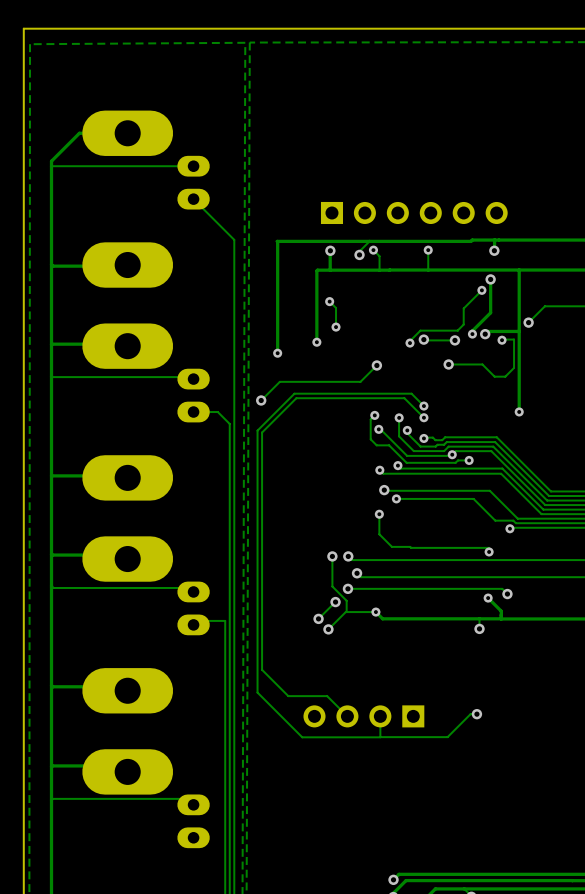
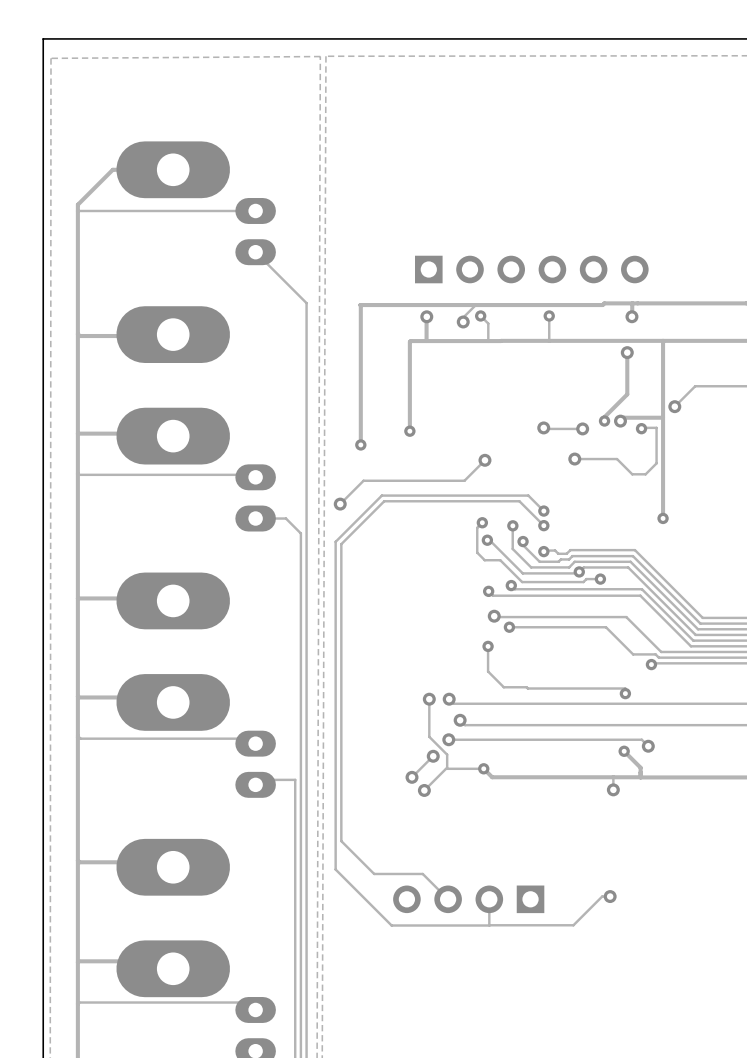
track: (481, 290) (463, 308) (463, 324) (457, 330) -> none
via: (481, 290) -> none
track: (329, 301) (336, 307) (336, 327) -> none
via: (329, 301) -> none
via: (336, 327) -> none
track: (457, 330) (420, 330) (409, 343) -> none
via: (409, 343) -> none

